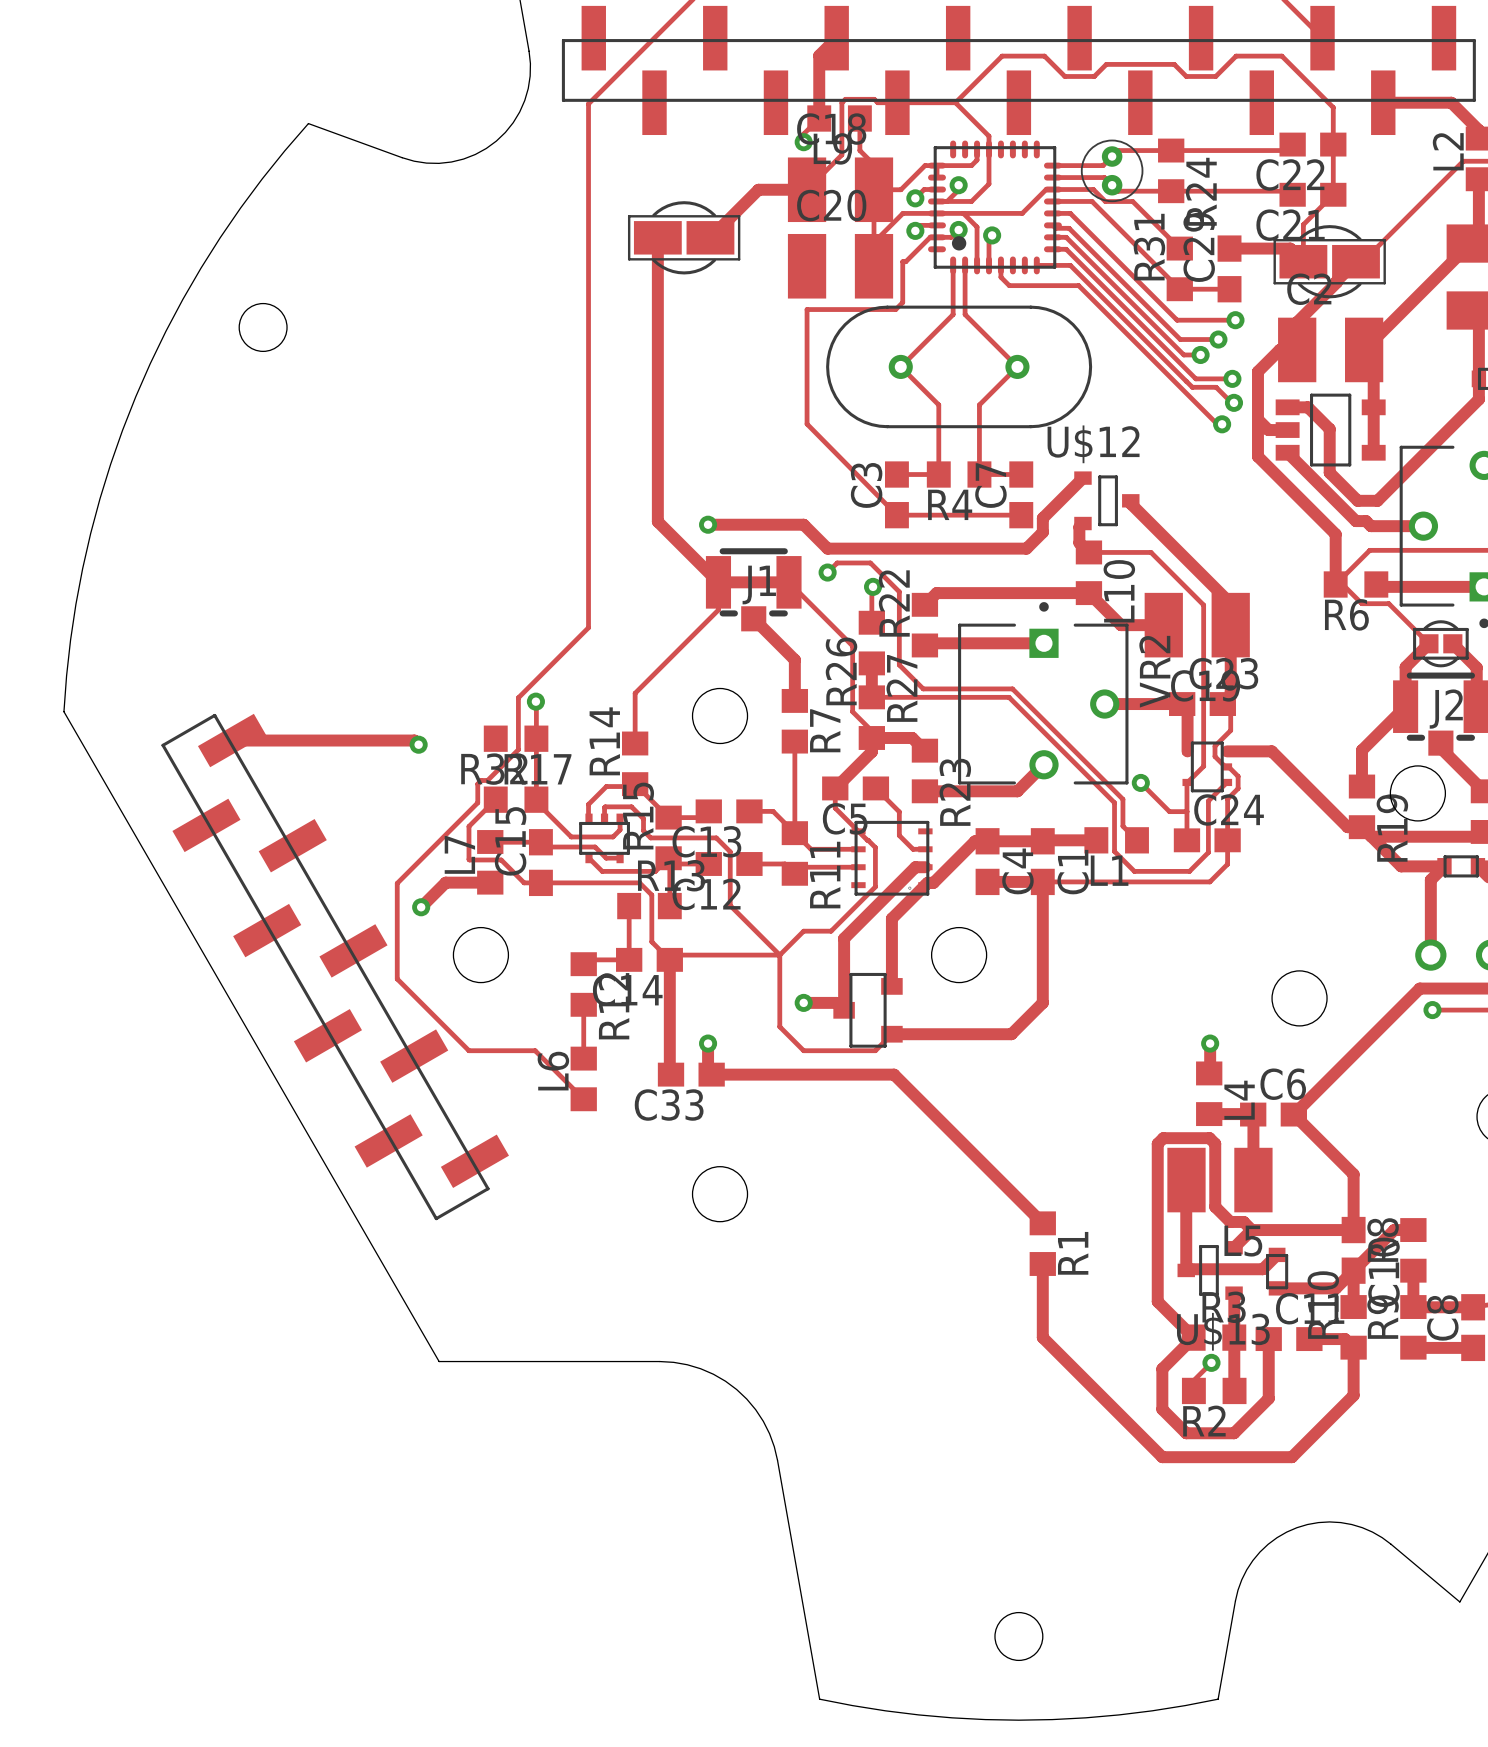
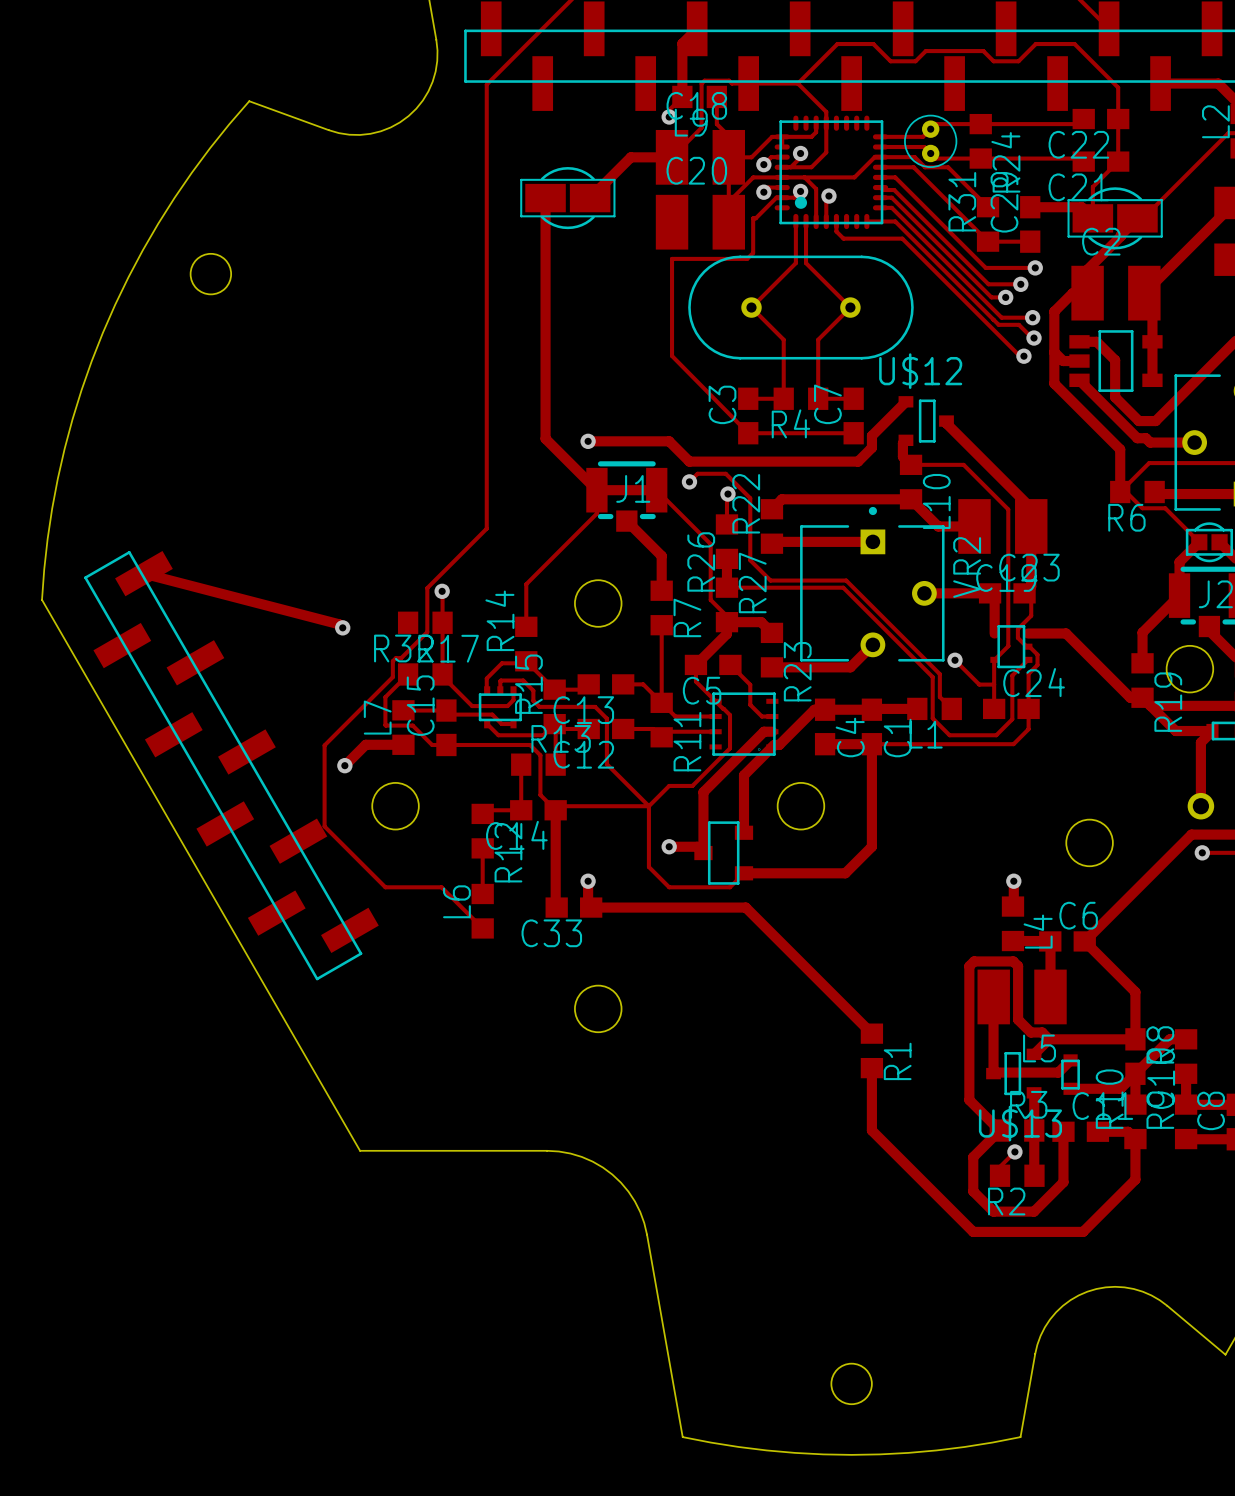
track: (232, 740) (414, 740) -> (143, 573) (339, 624)
part position: (335, 967) -> (231, 765)

